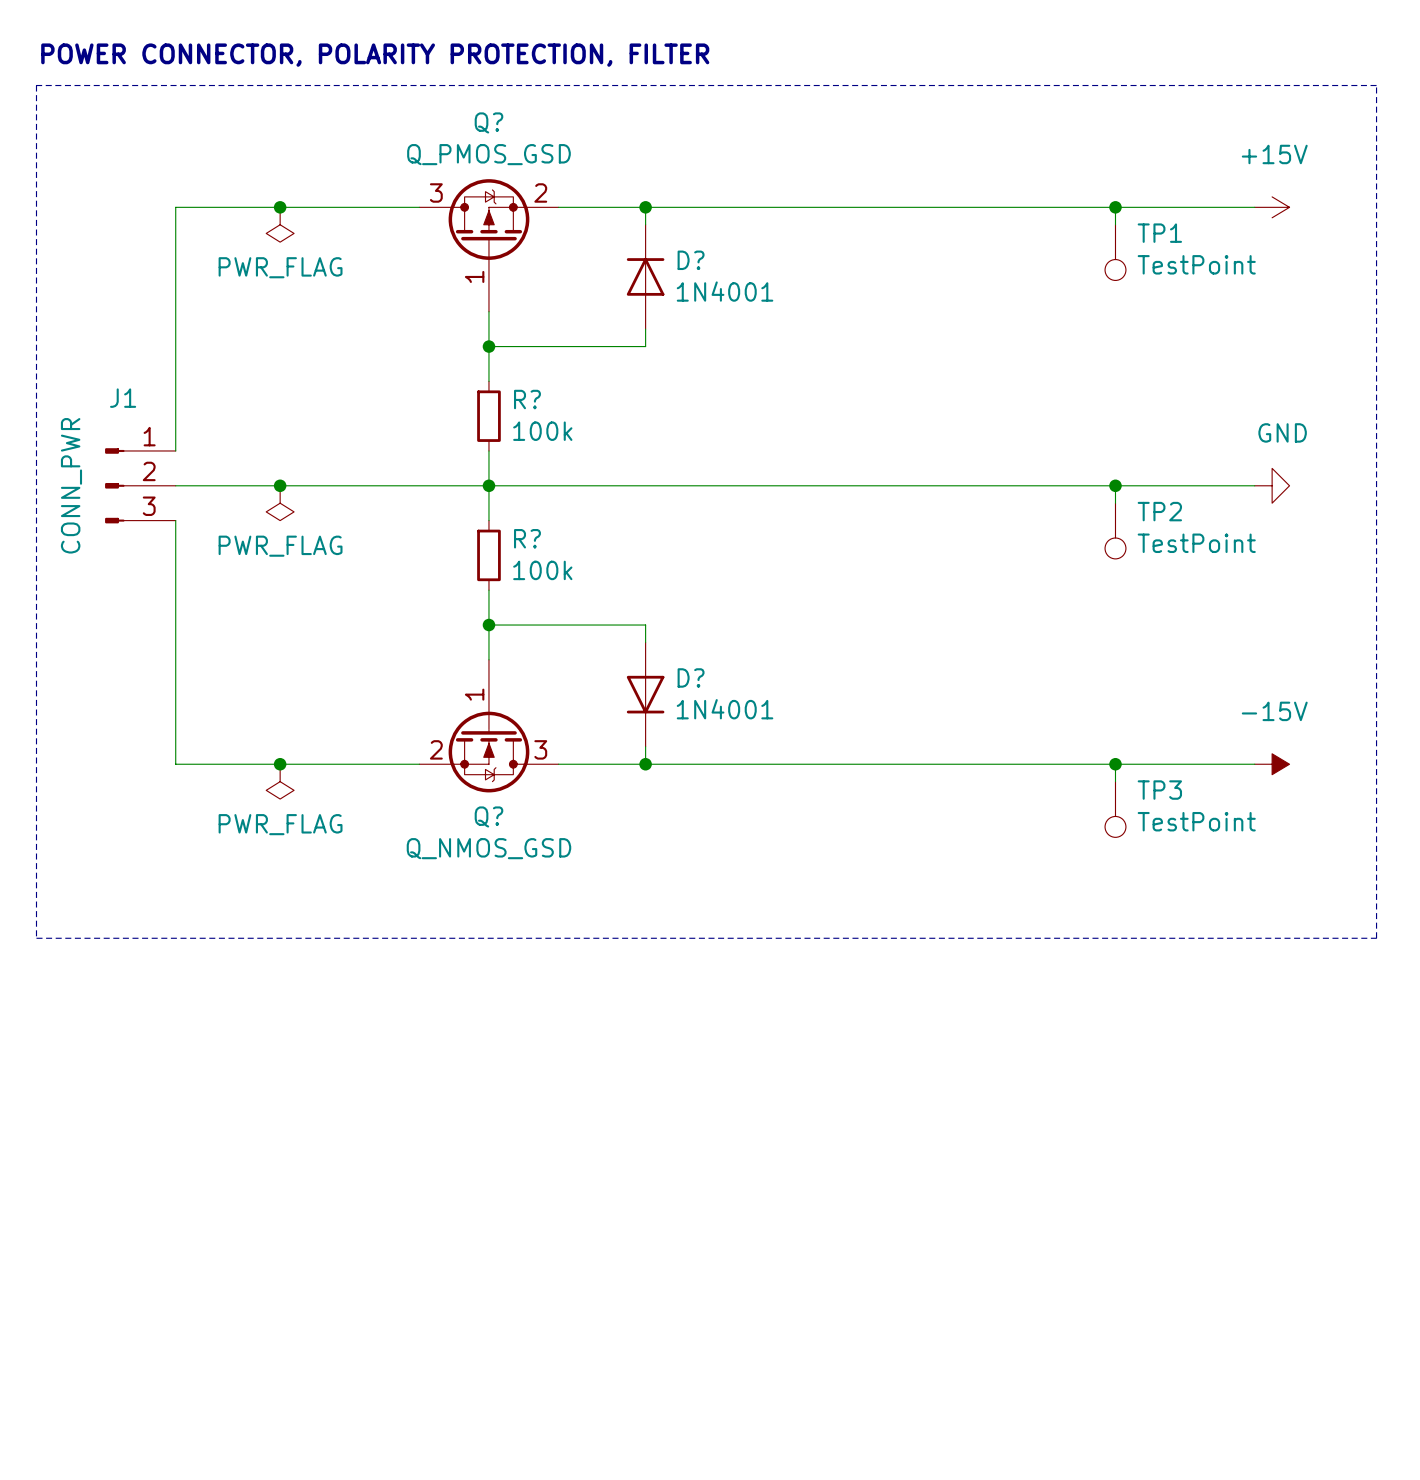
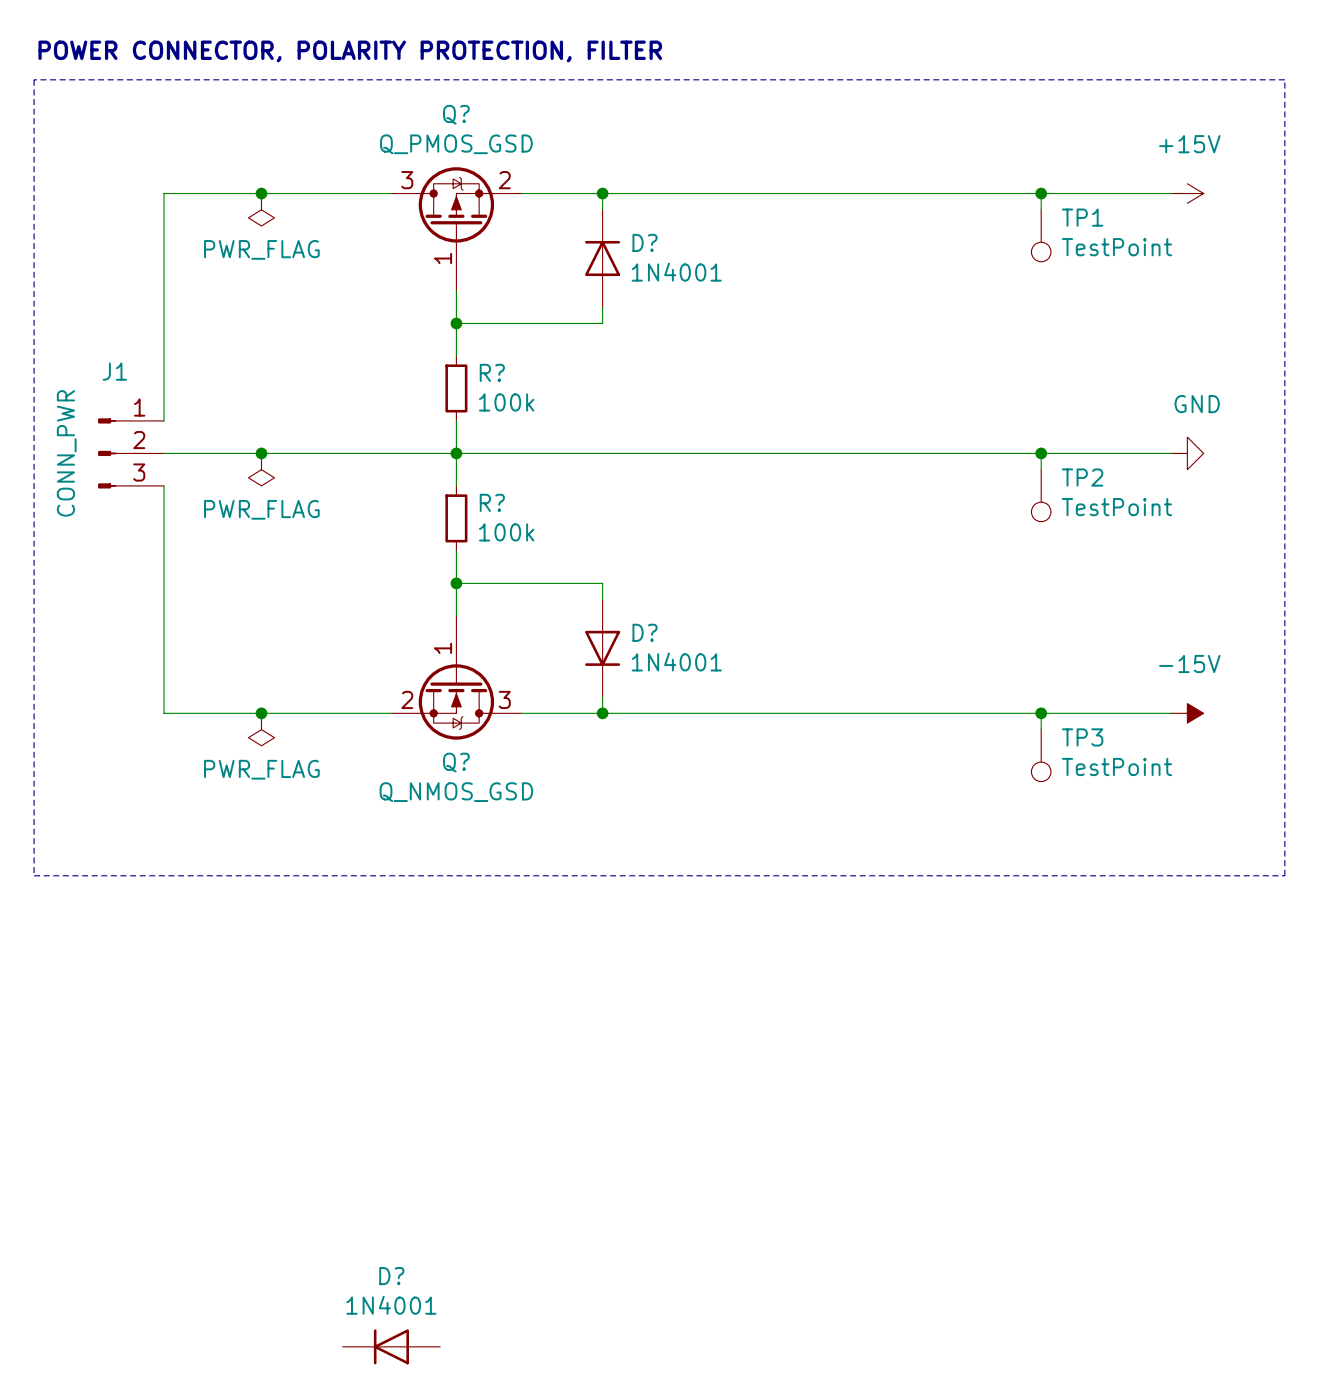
D?: none -> 1N4001 (391, 1346)

